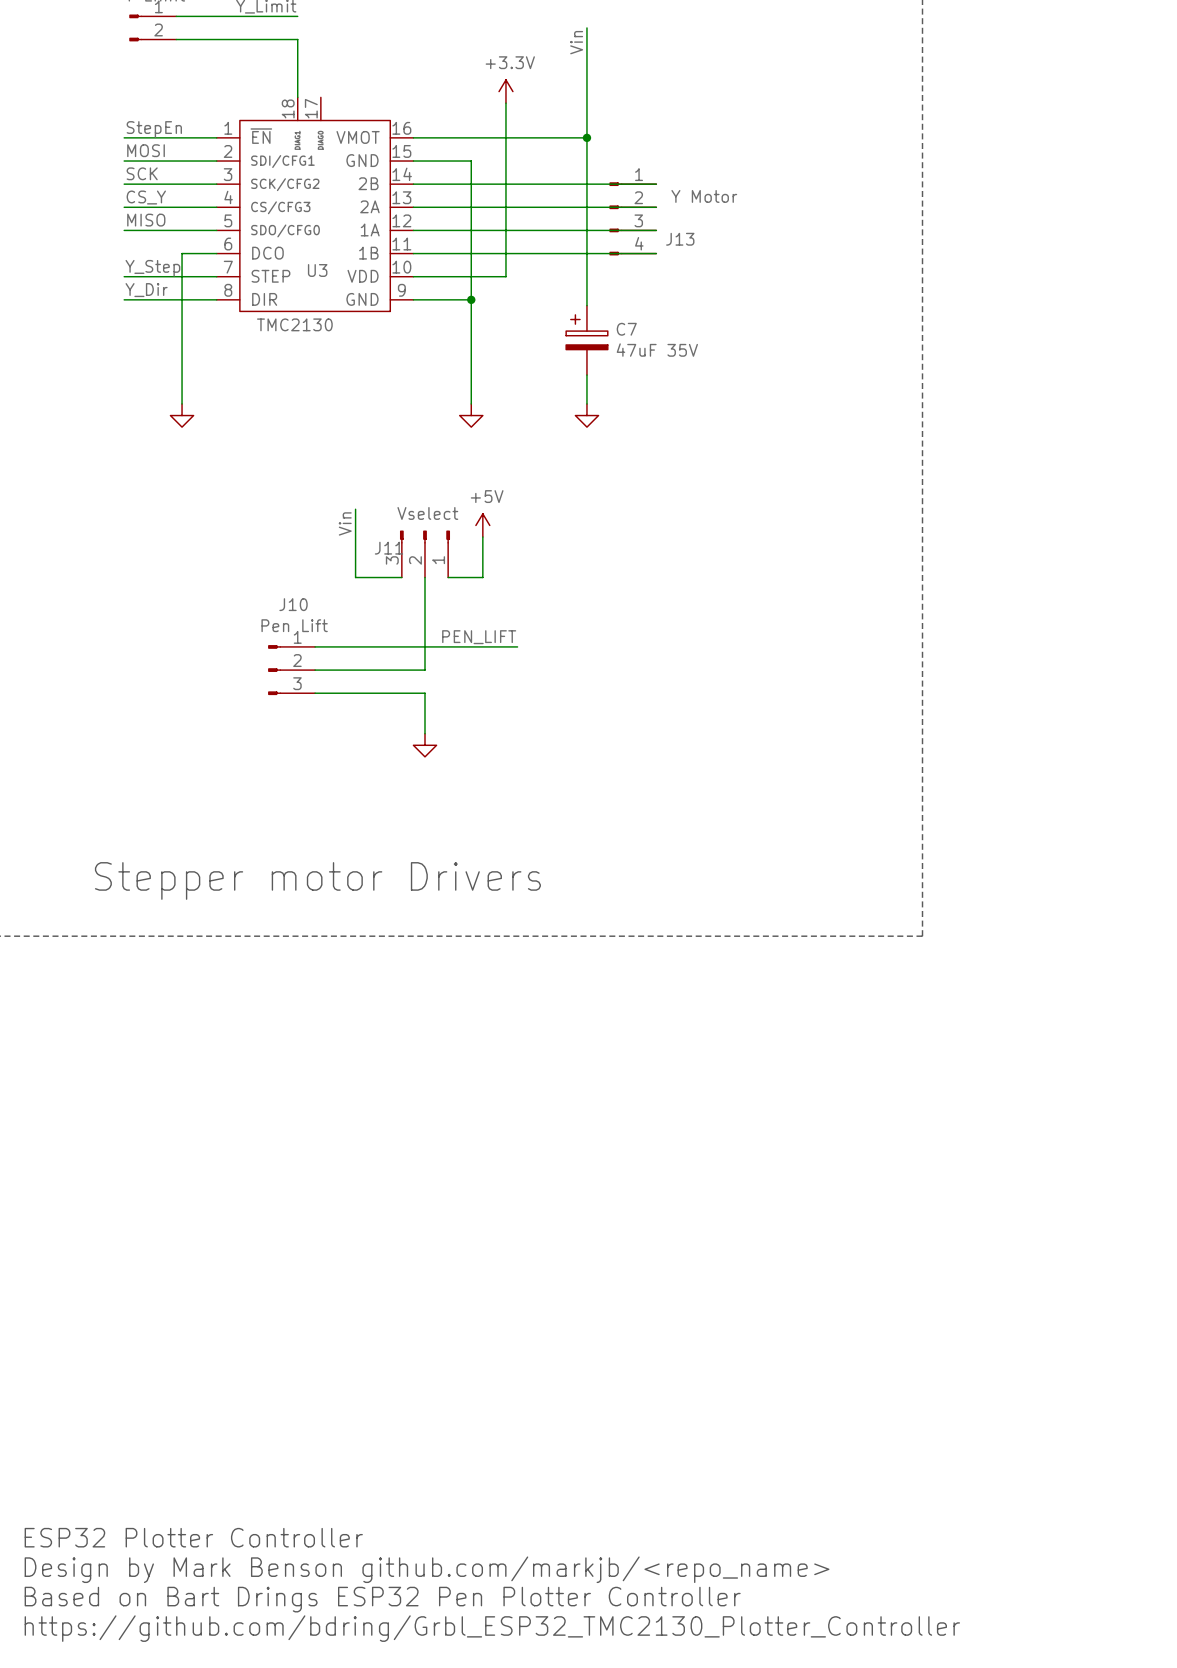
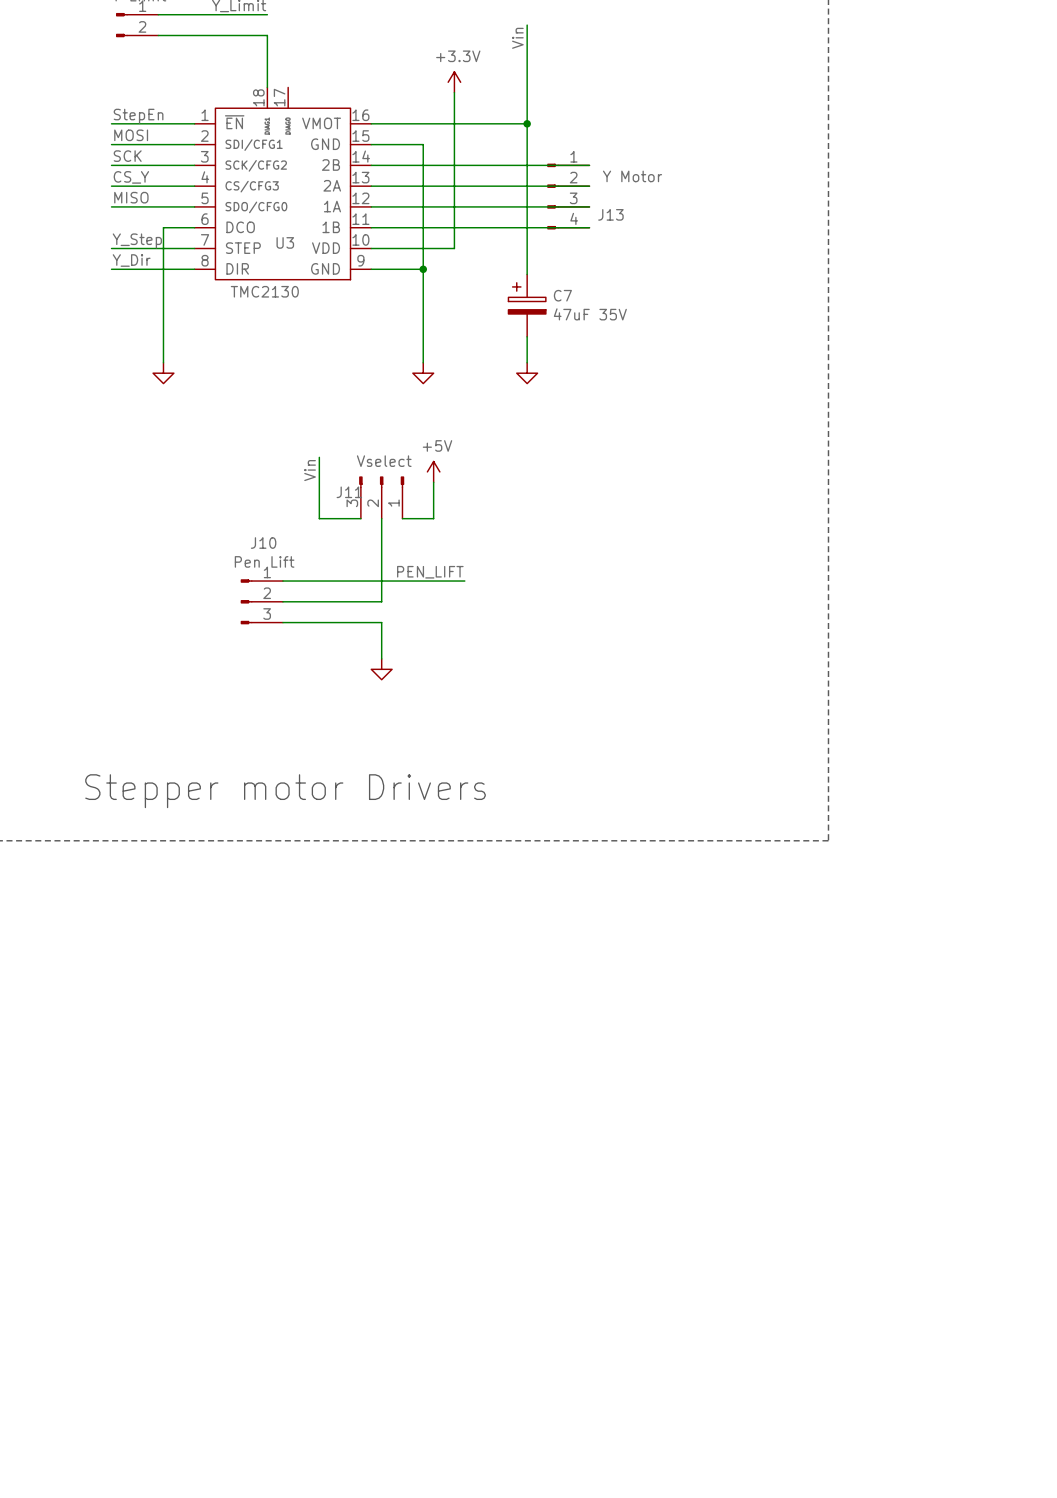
text: ESP32 Plotter Controller (193, 1537) -> none
text: Design by Mark Benson github.com/markjb/<repo_name> (427, 1569) -> none
text: Based on Bart Drings ESP32 Pen Plotter Controller (382, 1599) -> none
text: https://github.com/bdring/Grbl_ESP32_TMC2130_Plotter_Controller (492, 1628) -> none

